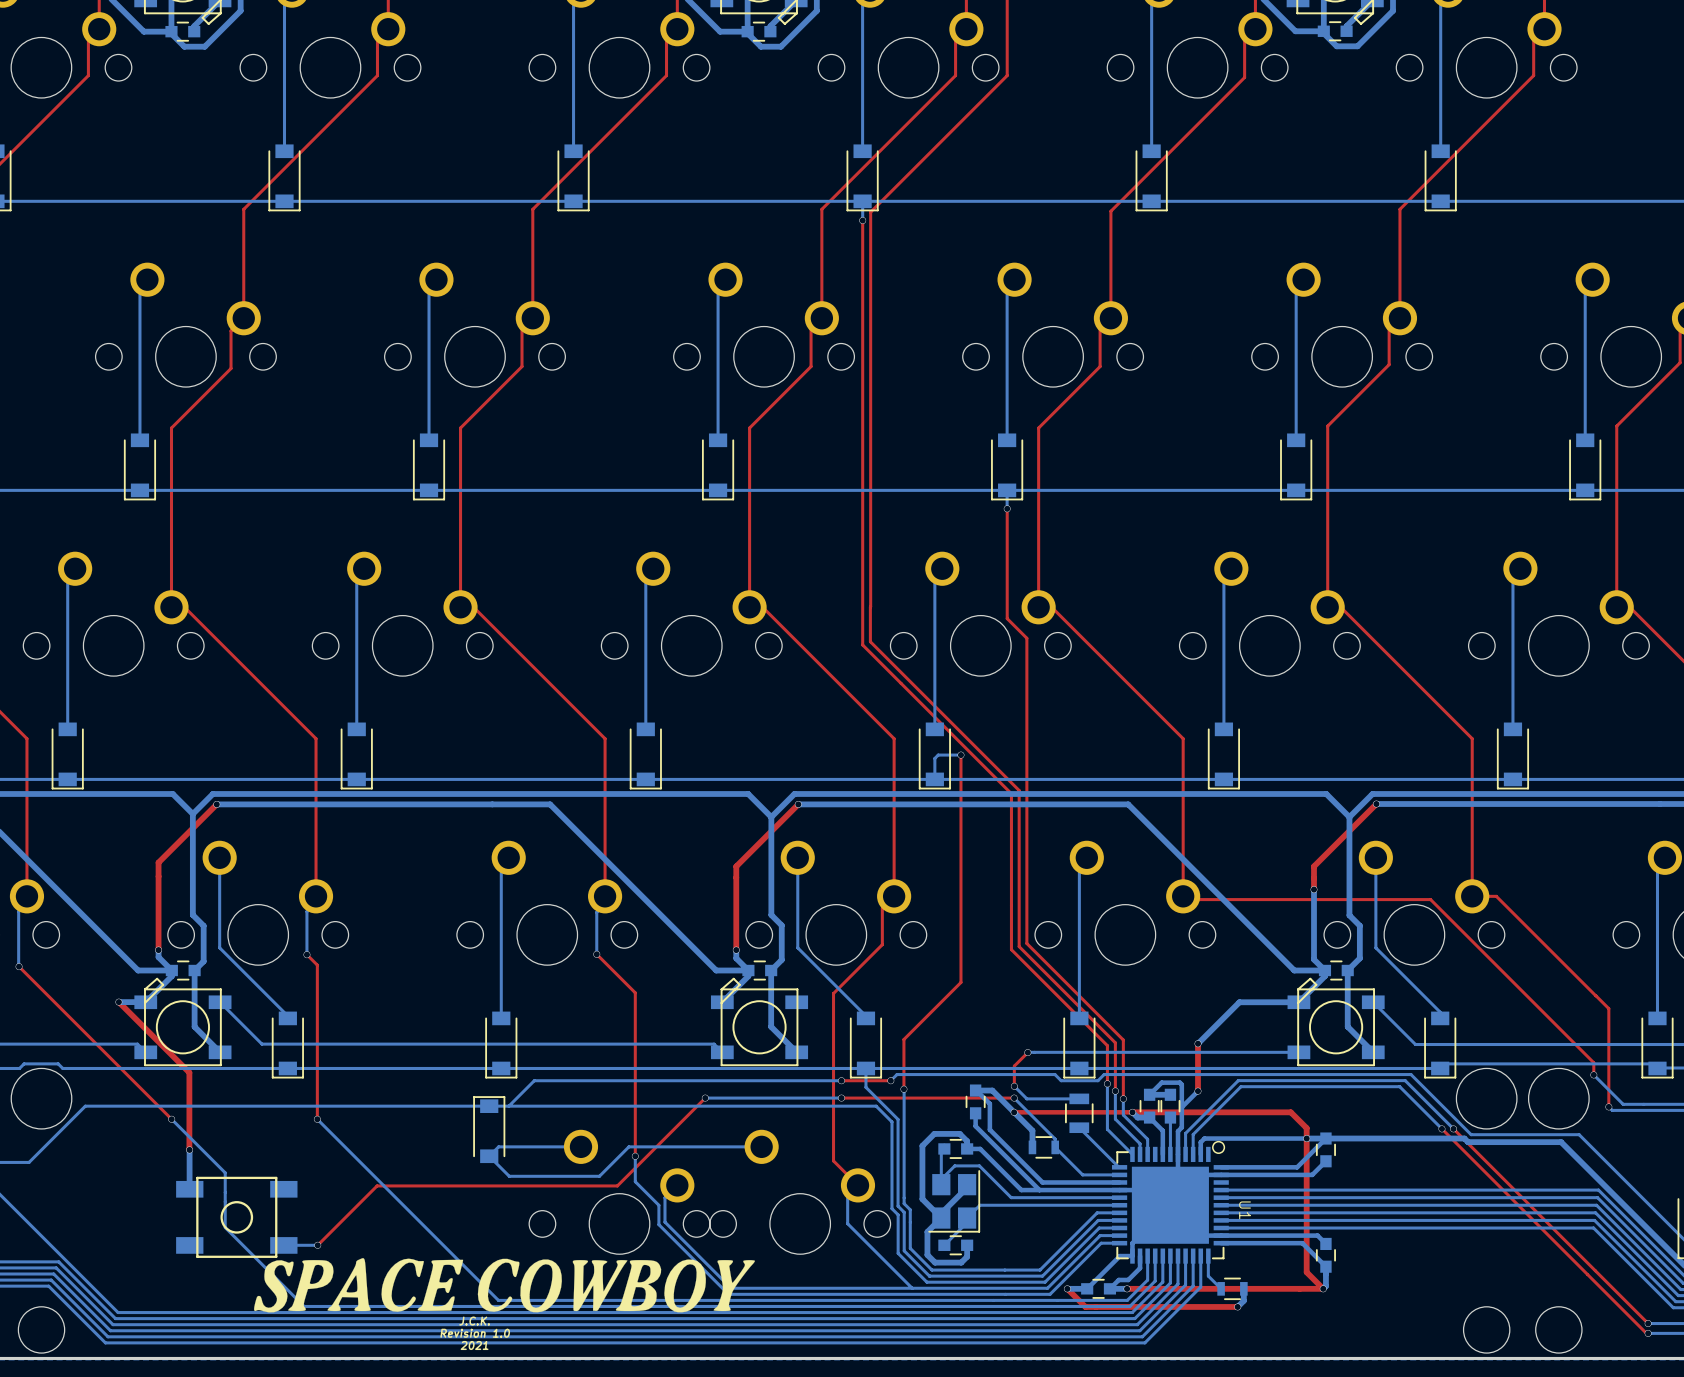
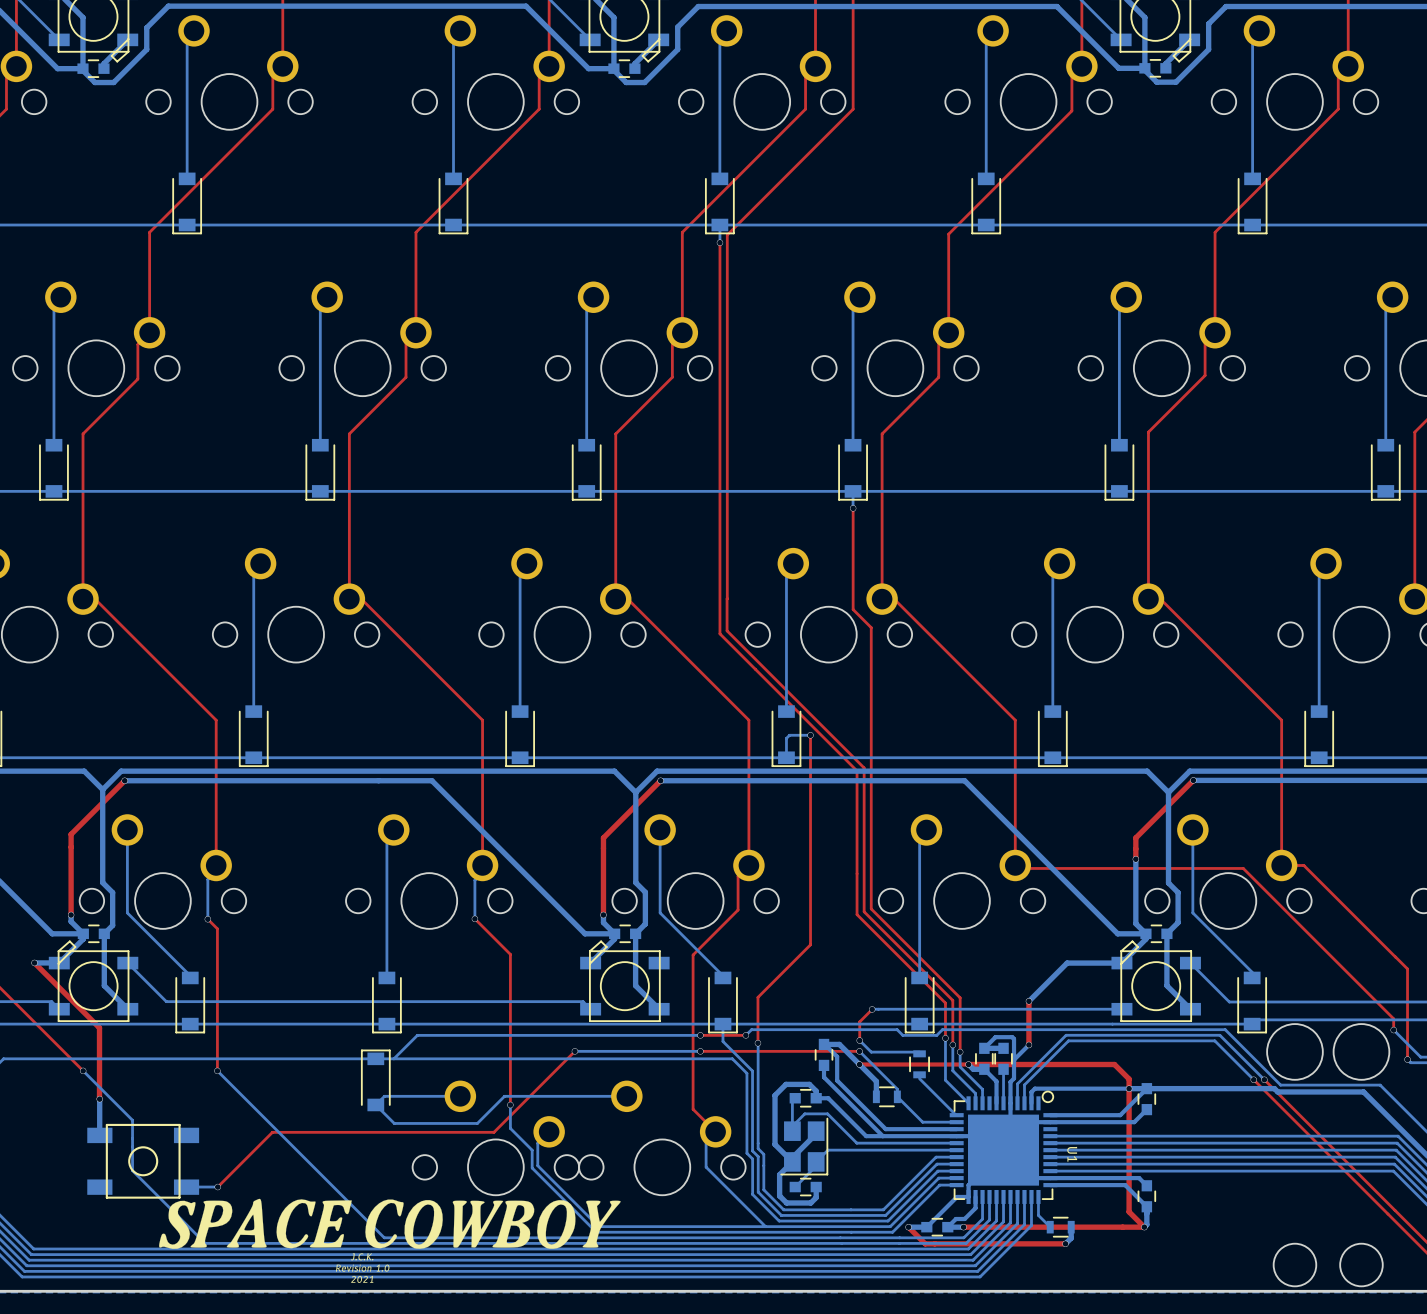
part footprint: [1065, 1093, 1094, 1134] -> [909, 1050, 930, 1079]

